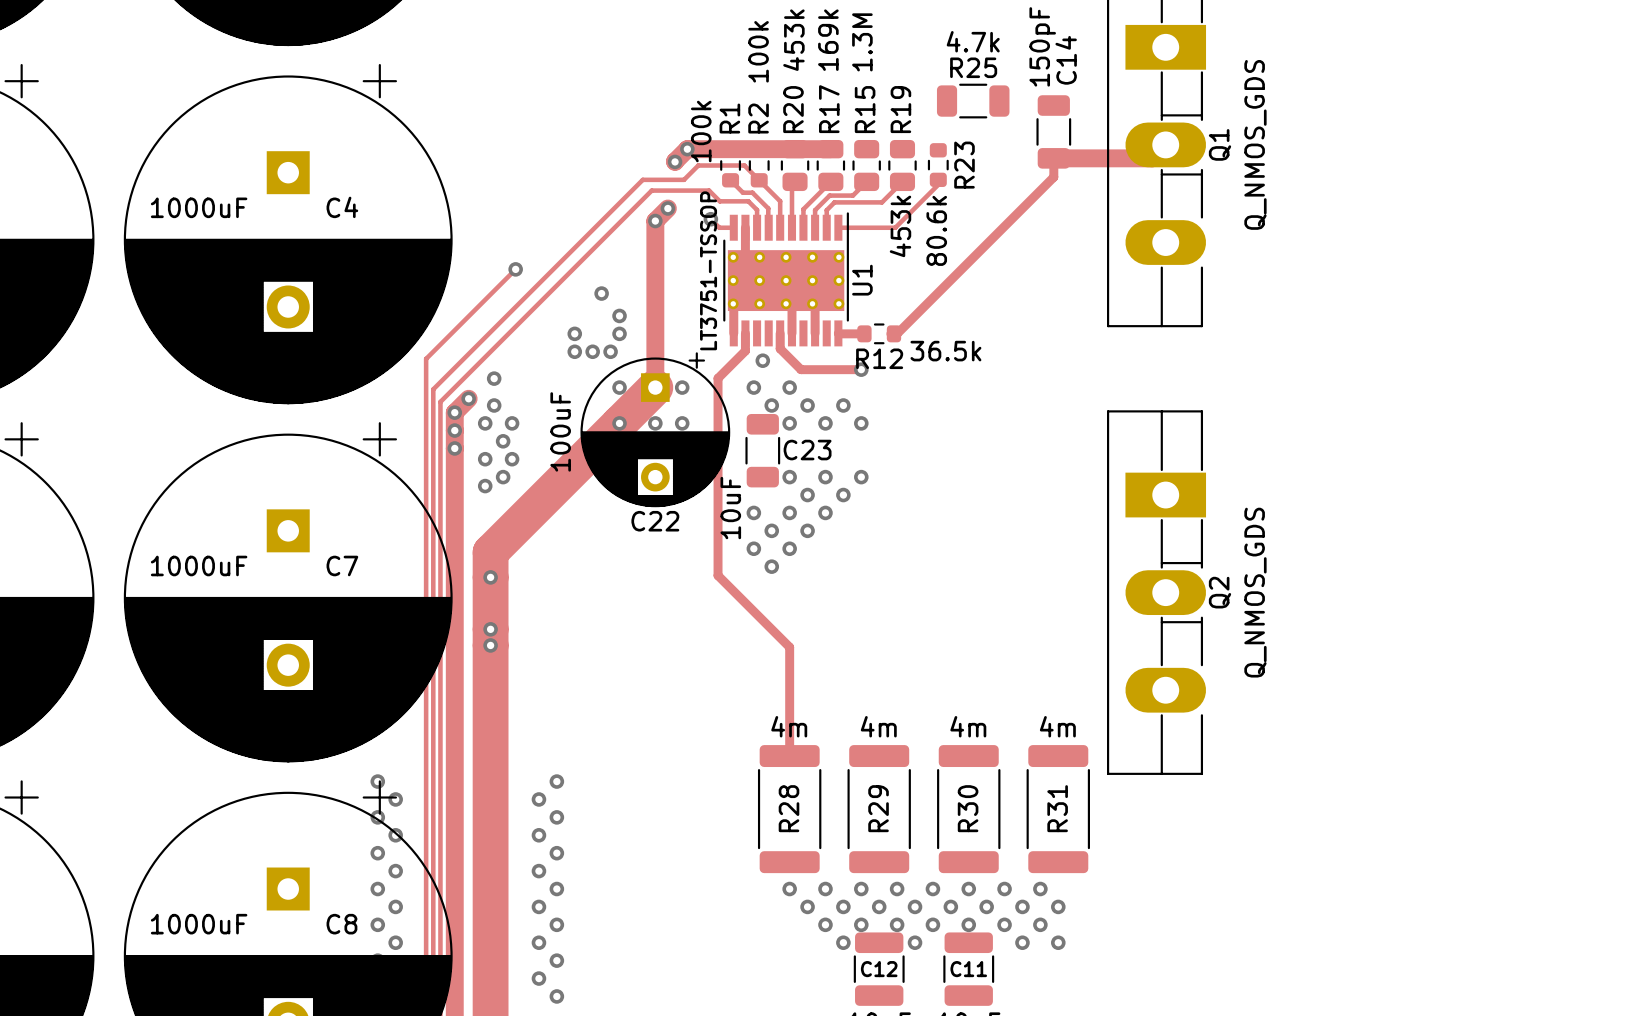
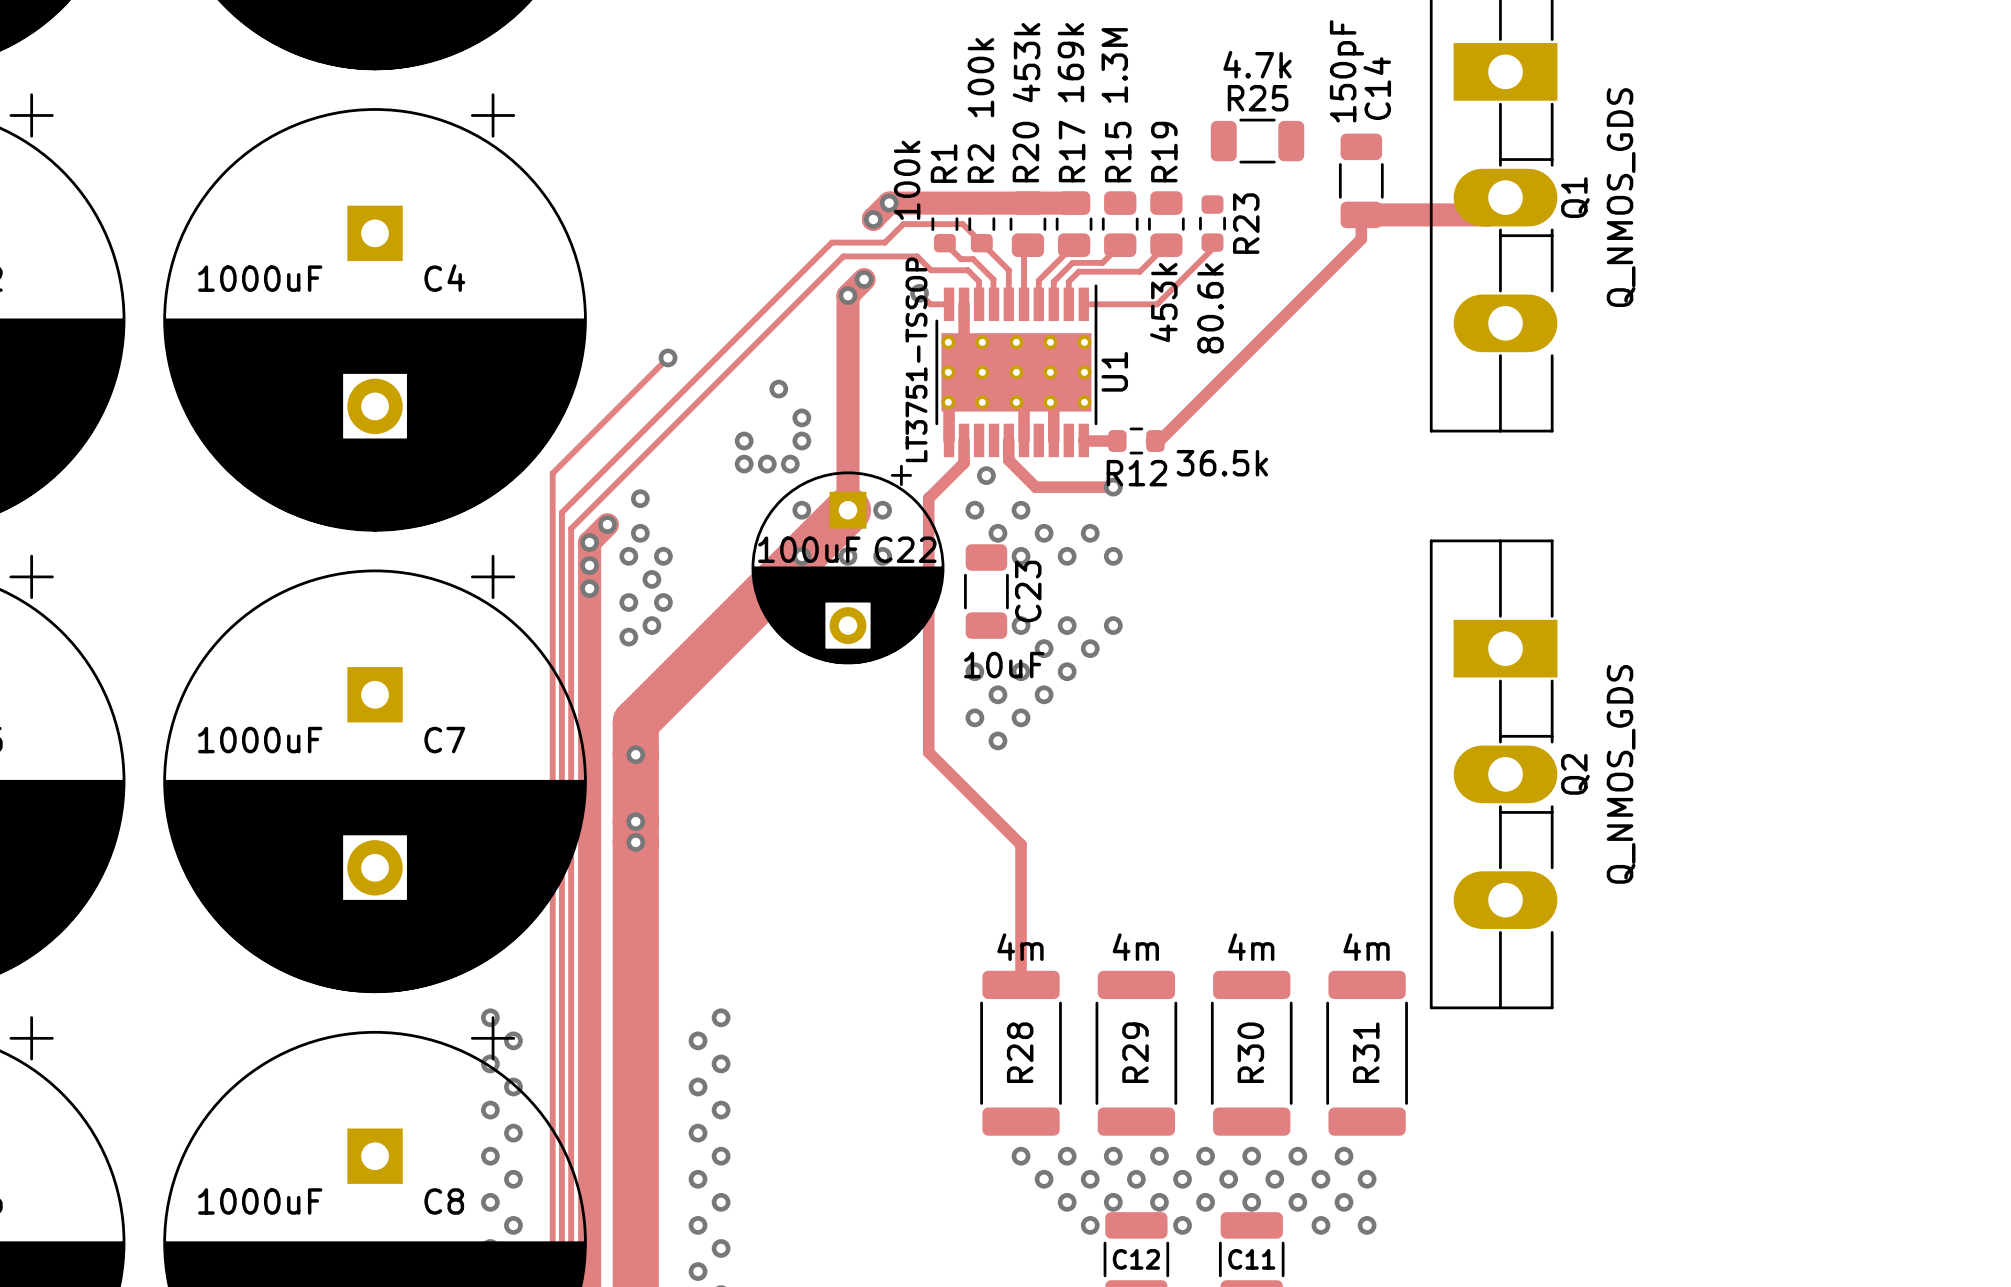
C22 value rotation: 0° (560, 431) -> 90° clockwise (809, 549)
C23 name rotation: 0° (807, 450) -> 90° counterclockwise (1028, 591)
C23 value rotation: 0° (730, 508) -> 90° clockwise (1004, 665)
C22 name position: C22 (655, 521) -> C22 (905, 549)

